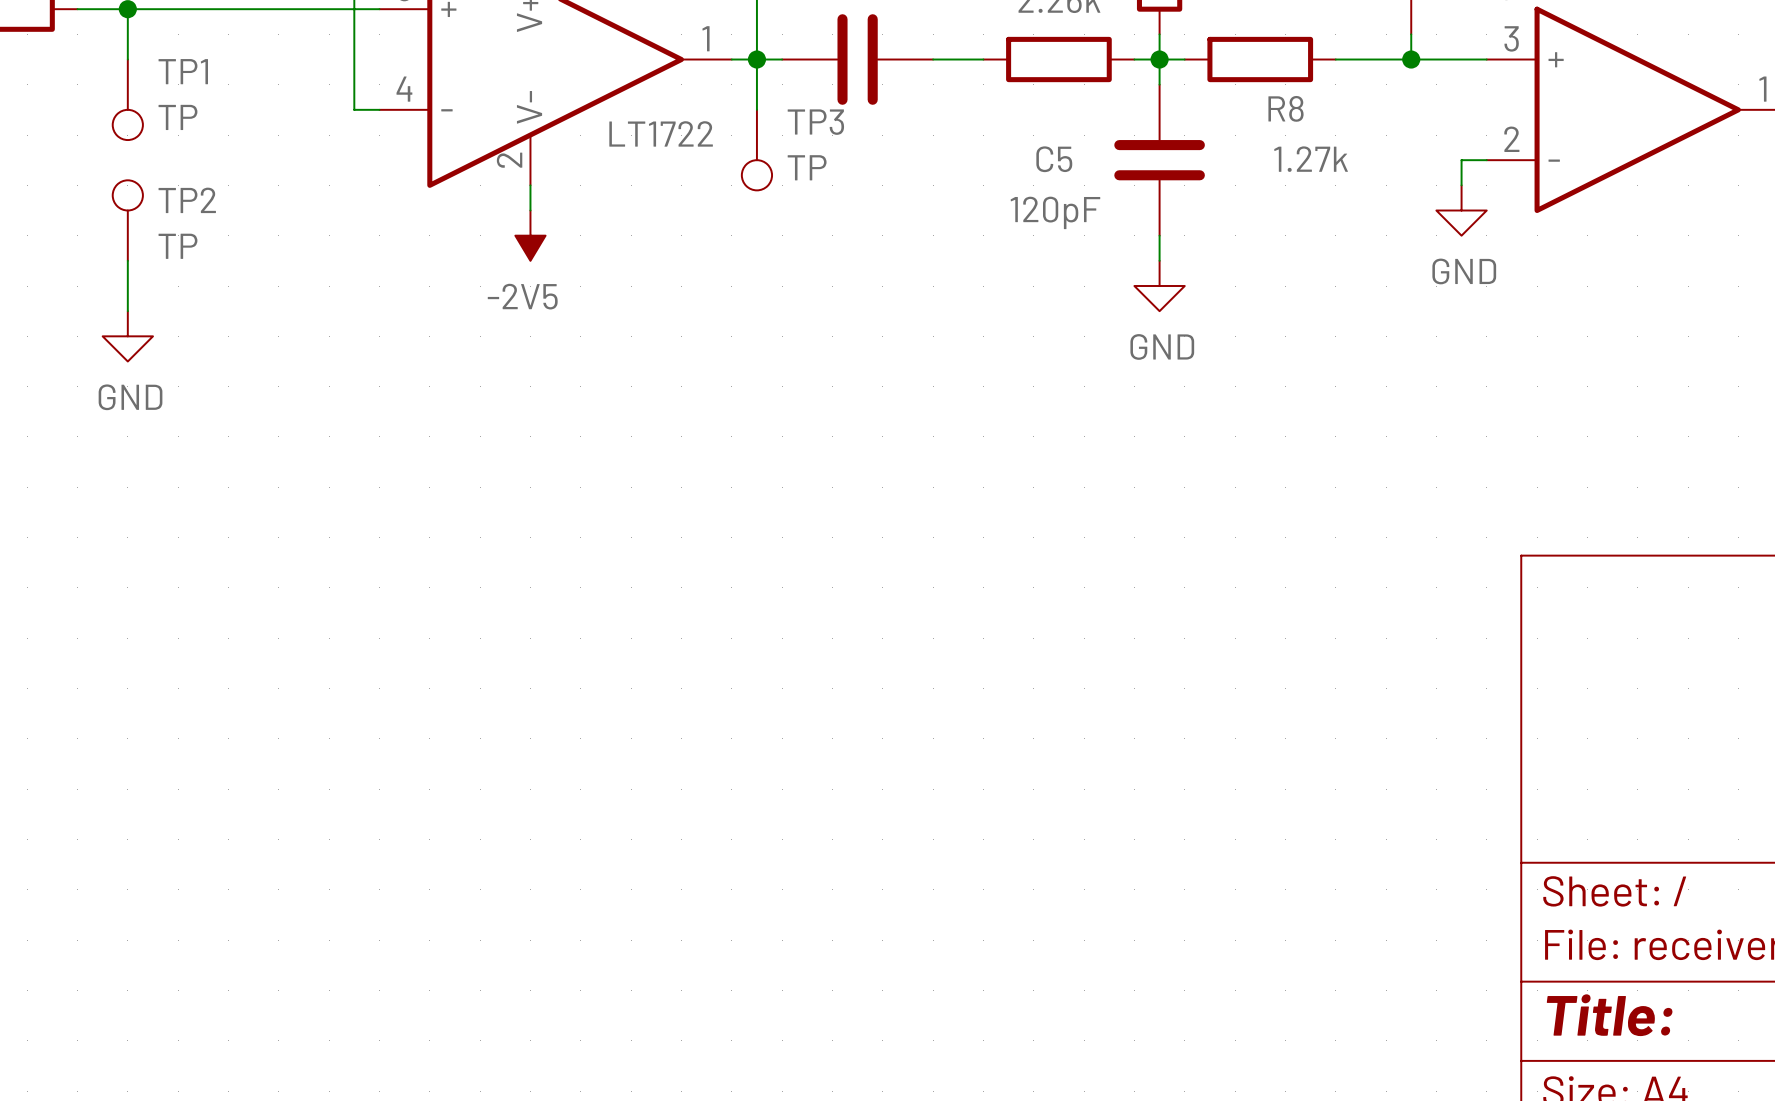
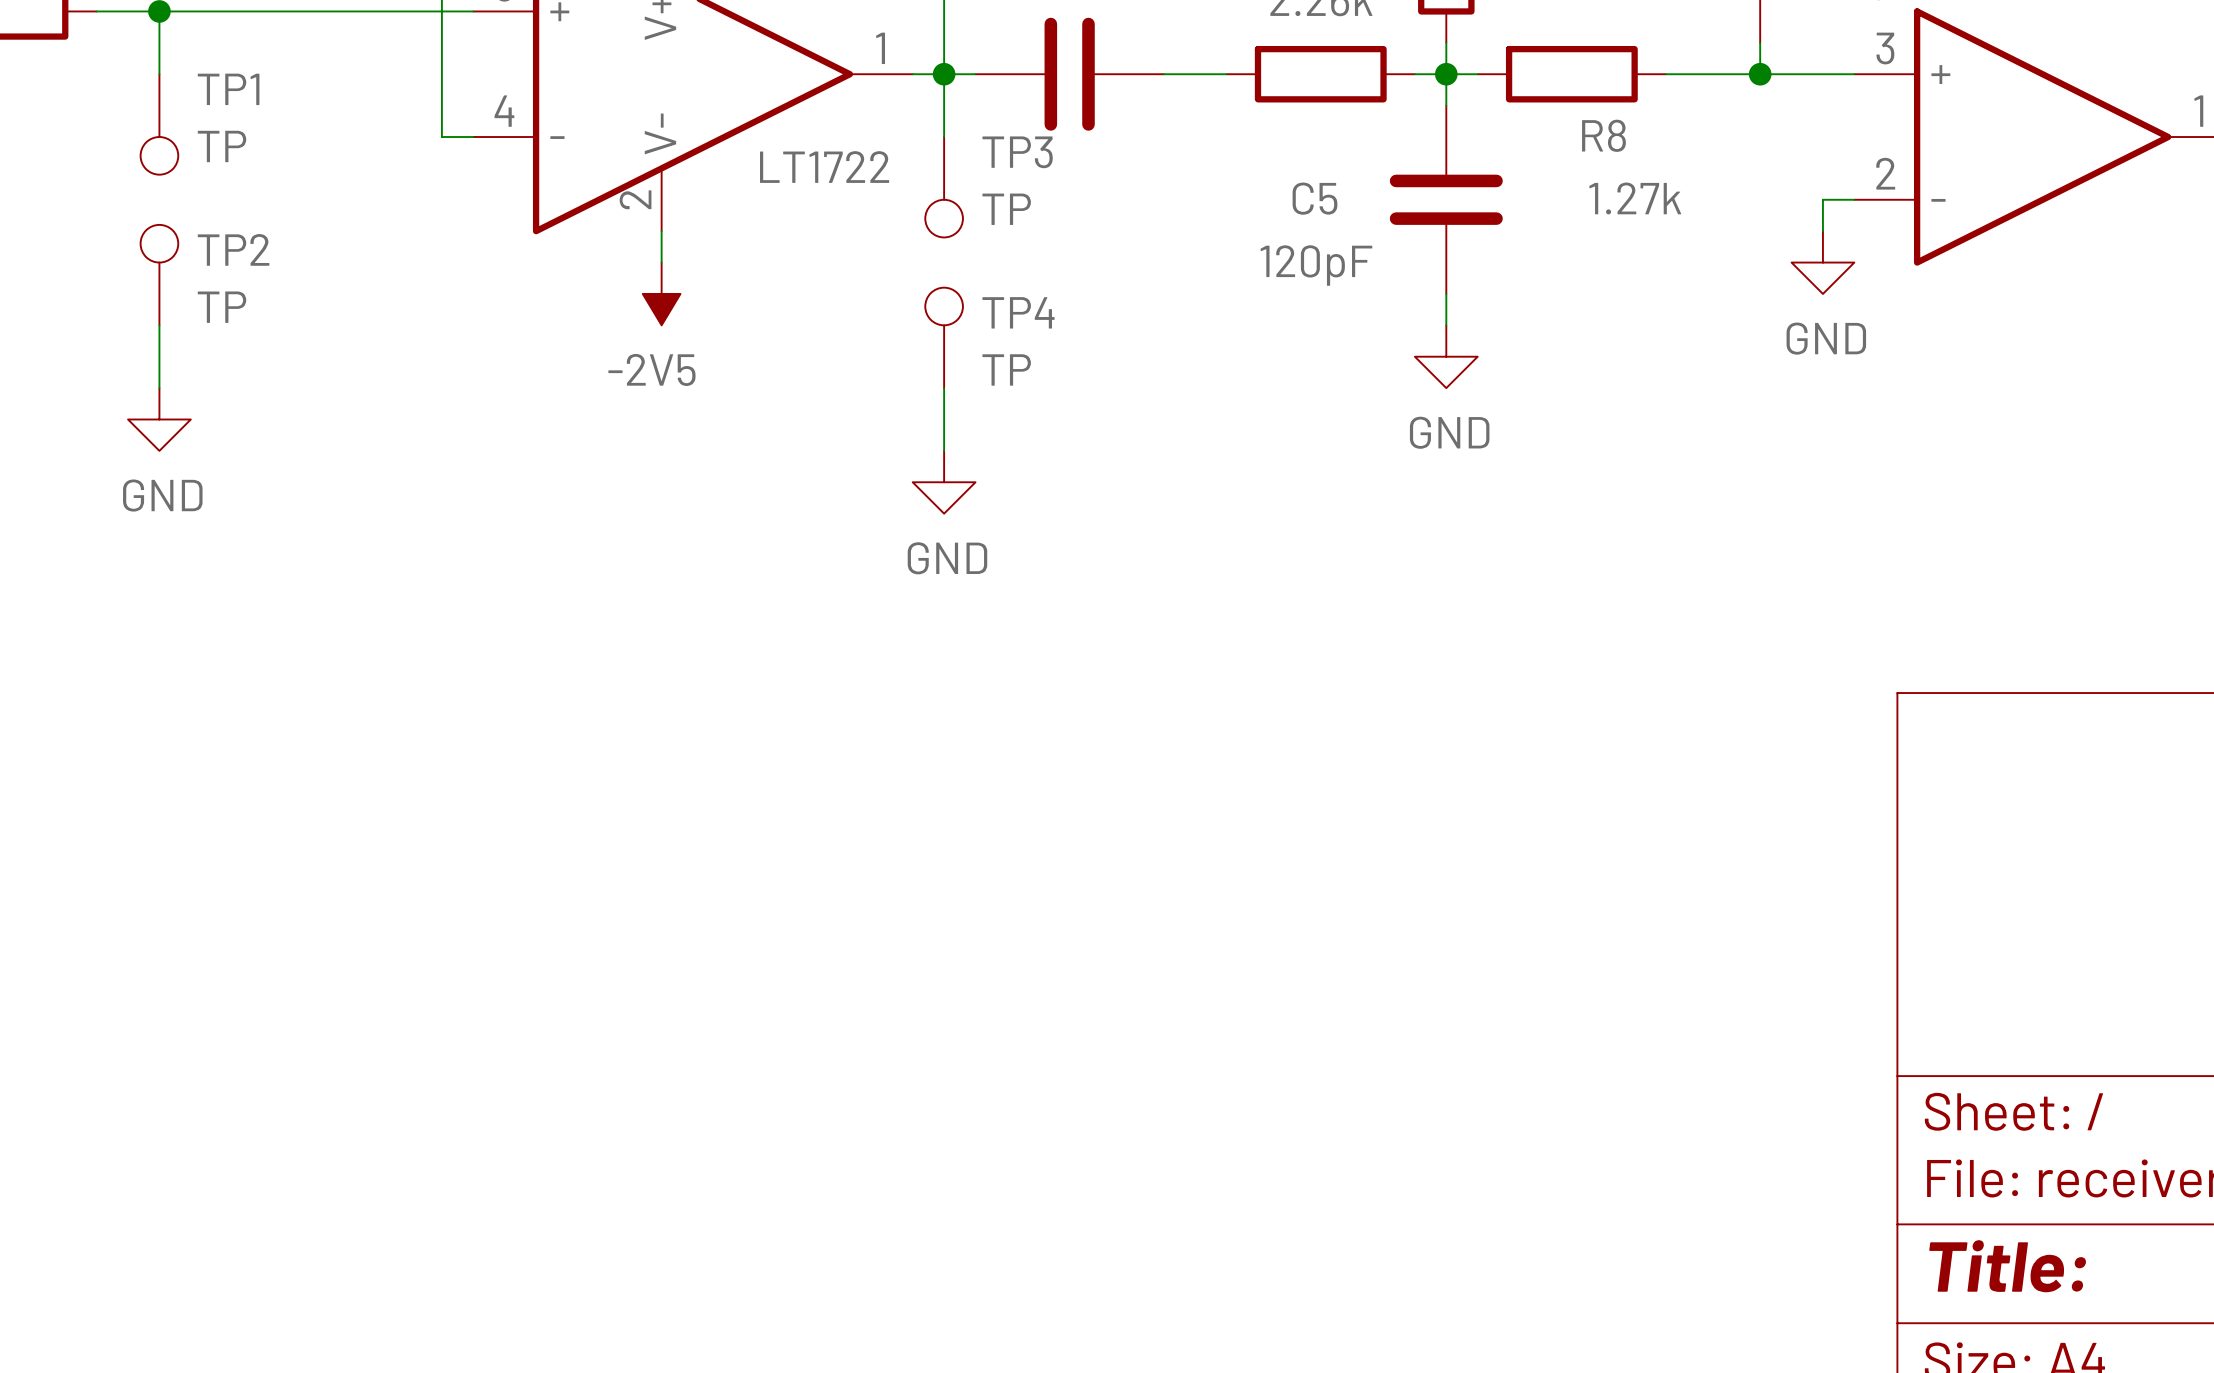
TP4: none -> TP (944, 337)
wire: none -> (944, 388) (944, 450)
power symbol: none -> GND (944, 482)

